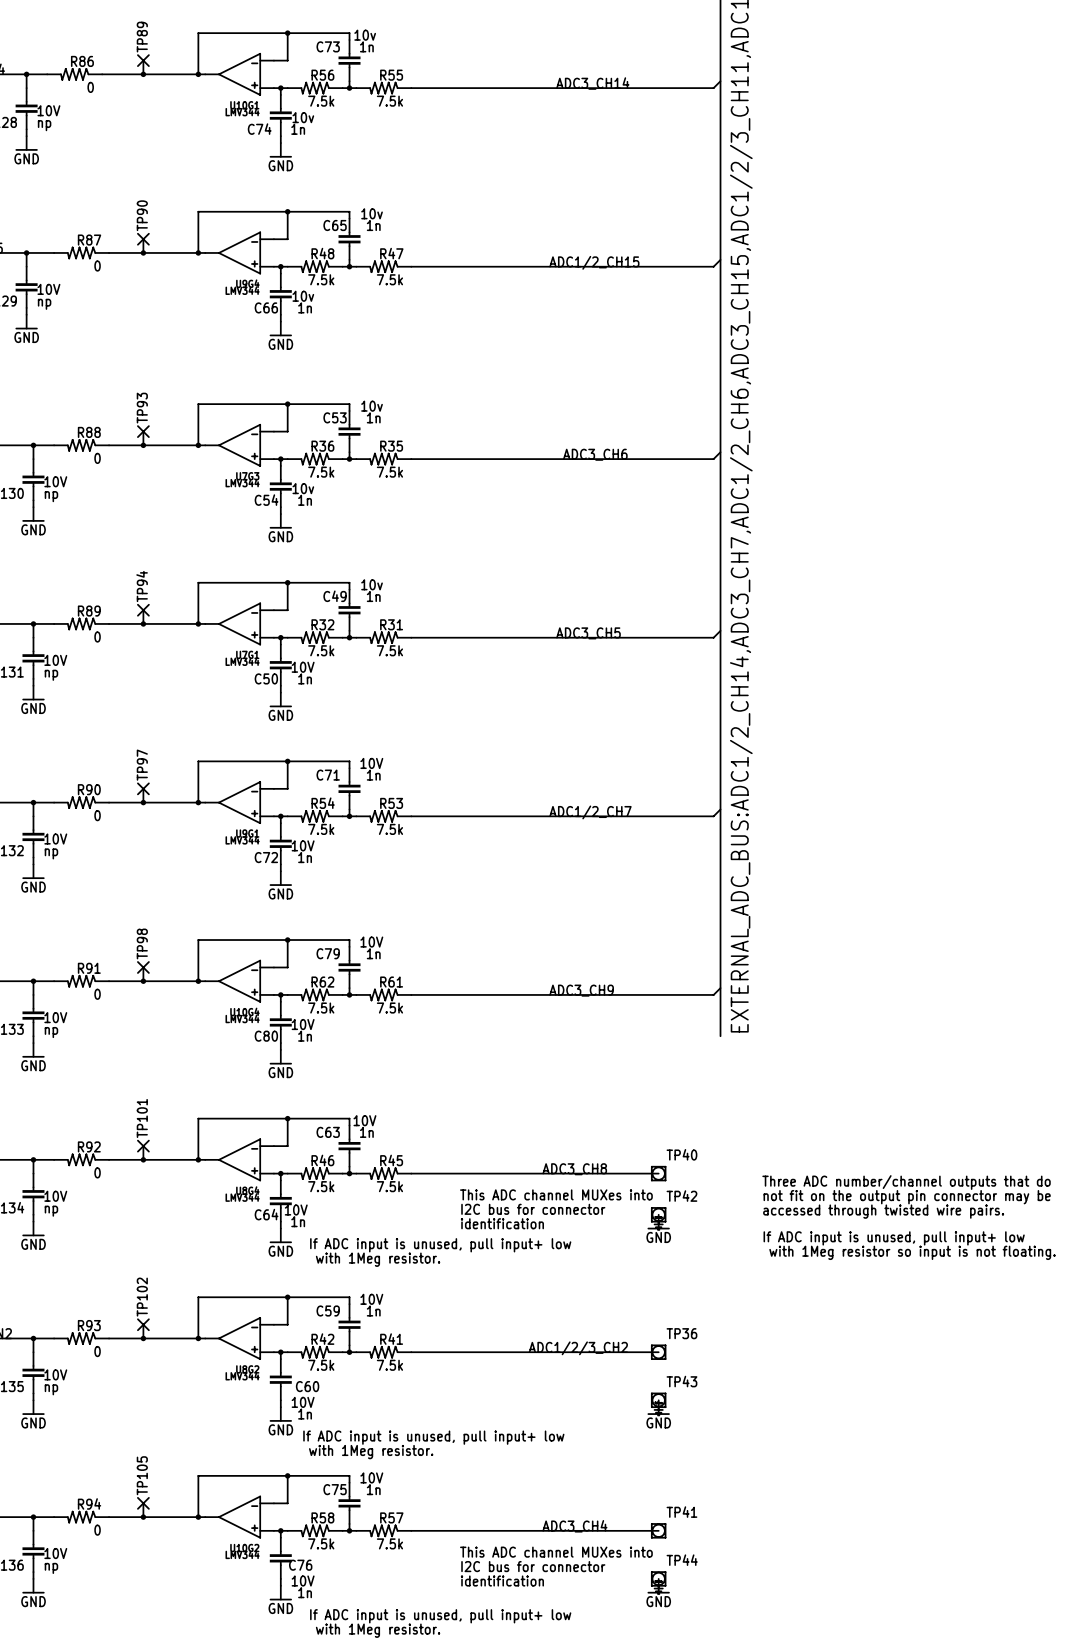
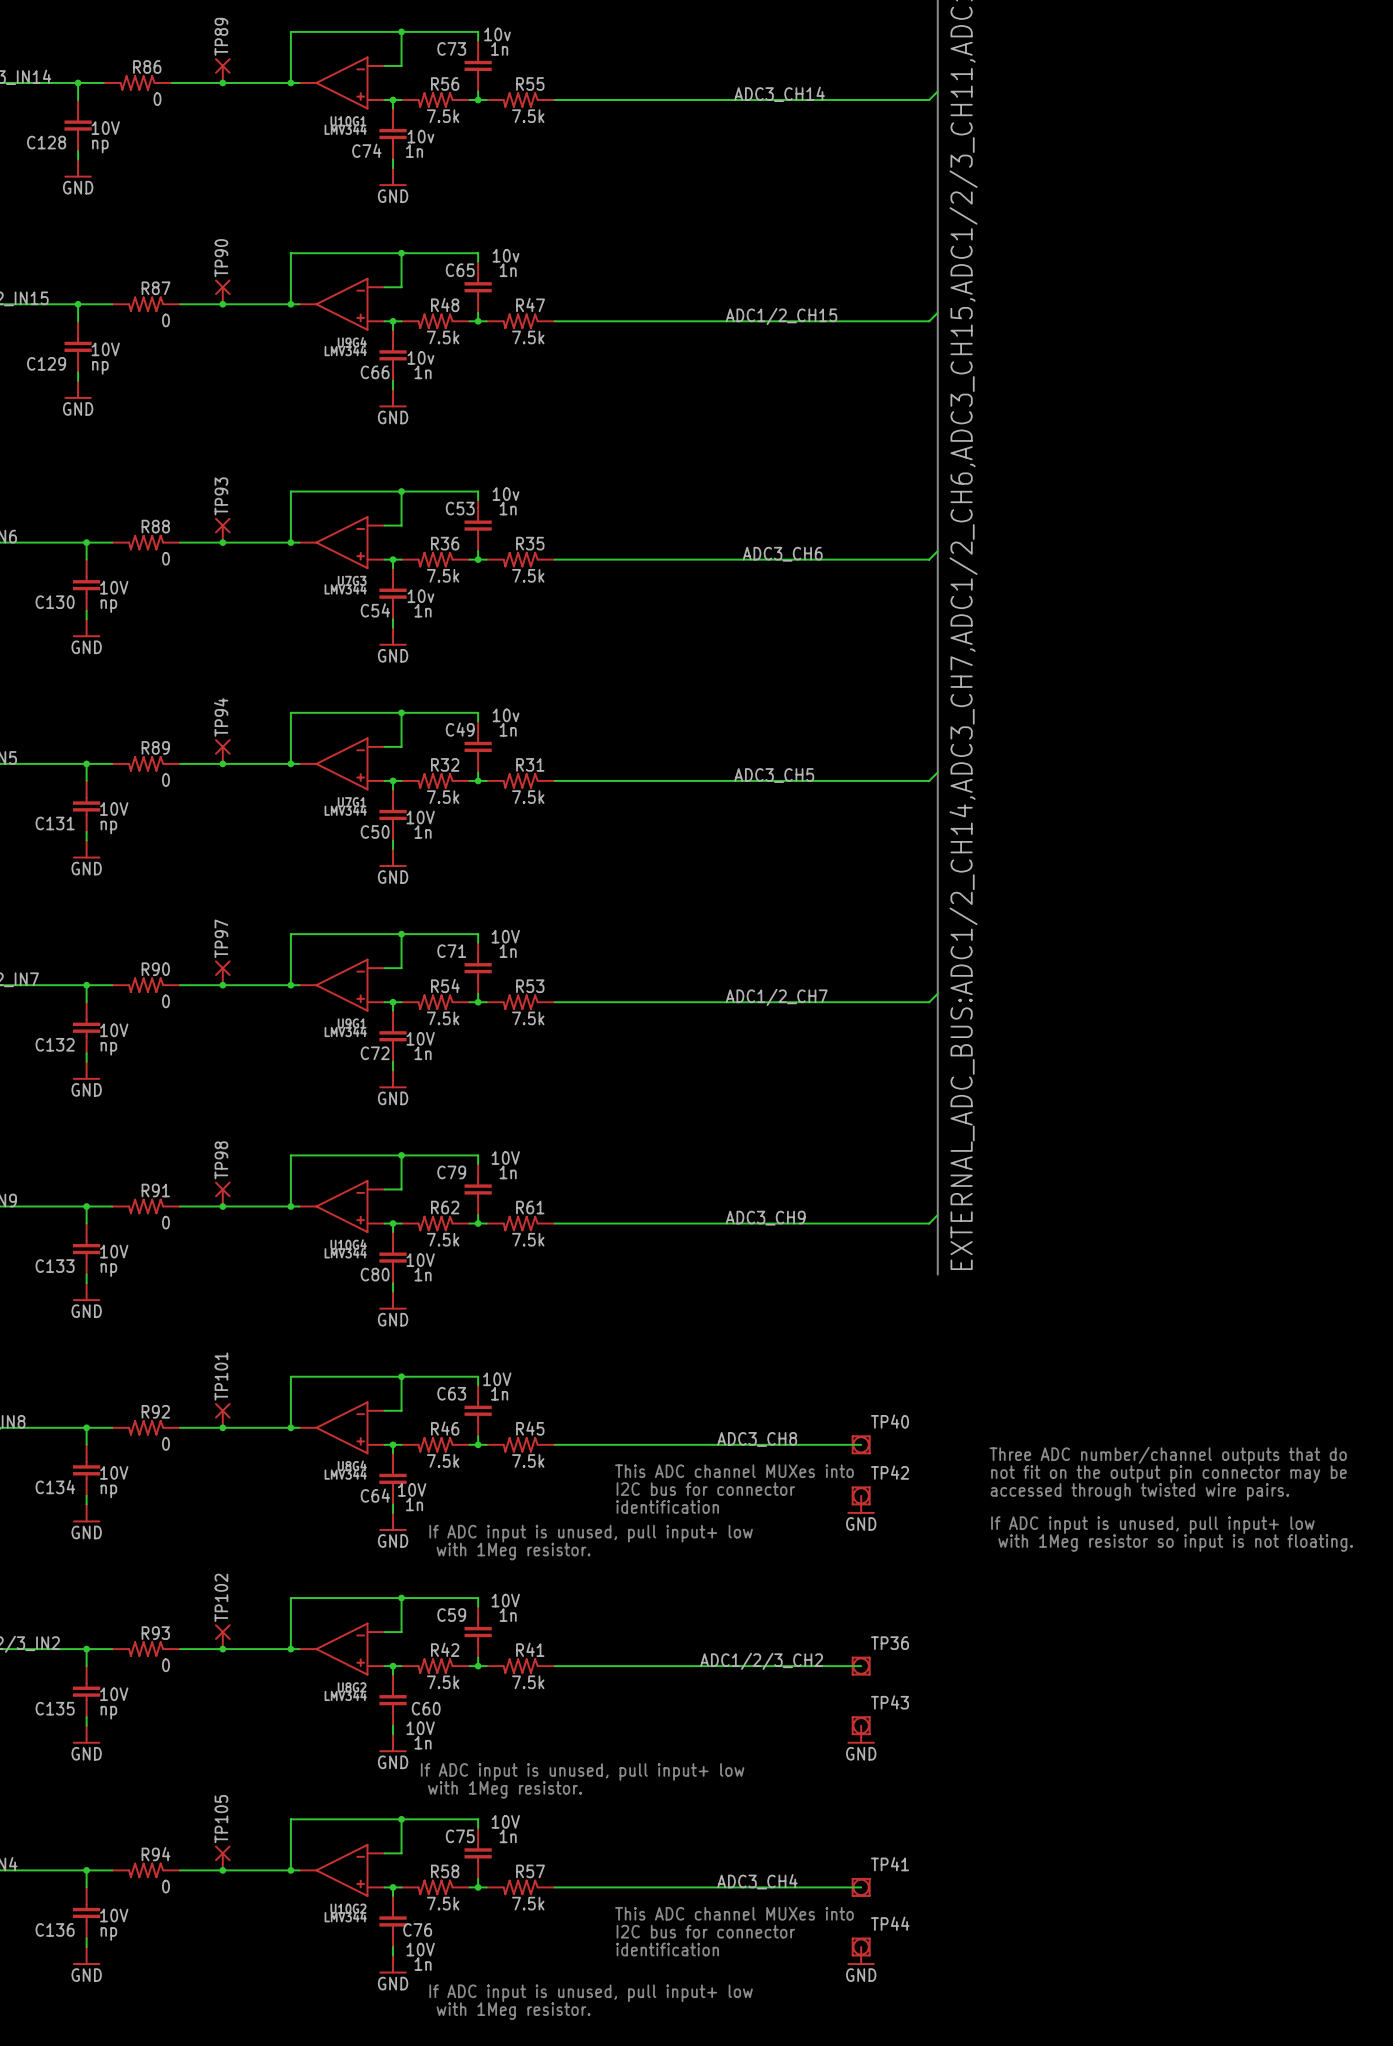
TP42 symbol: [651, 1207, 667, 1231] -> [851, 1486, 871, 1506]
TP43 symbol: [651, 1392, 667, 1417] -> [851, 1716, 871, 1736]
TP44 symbol: [651, 1571, 667, 1595] -> [851, 1937, 871, 1957]

